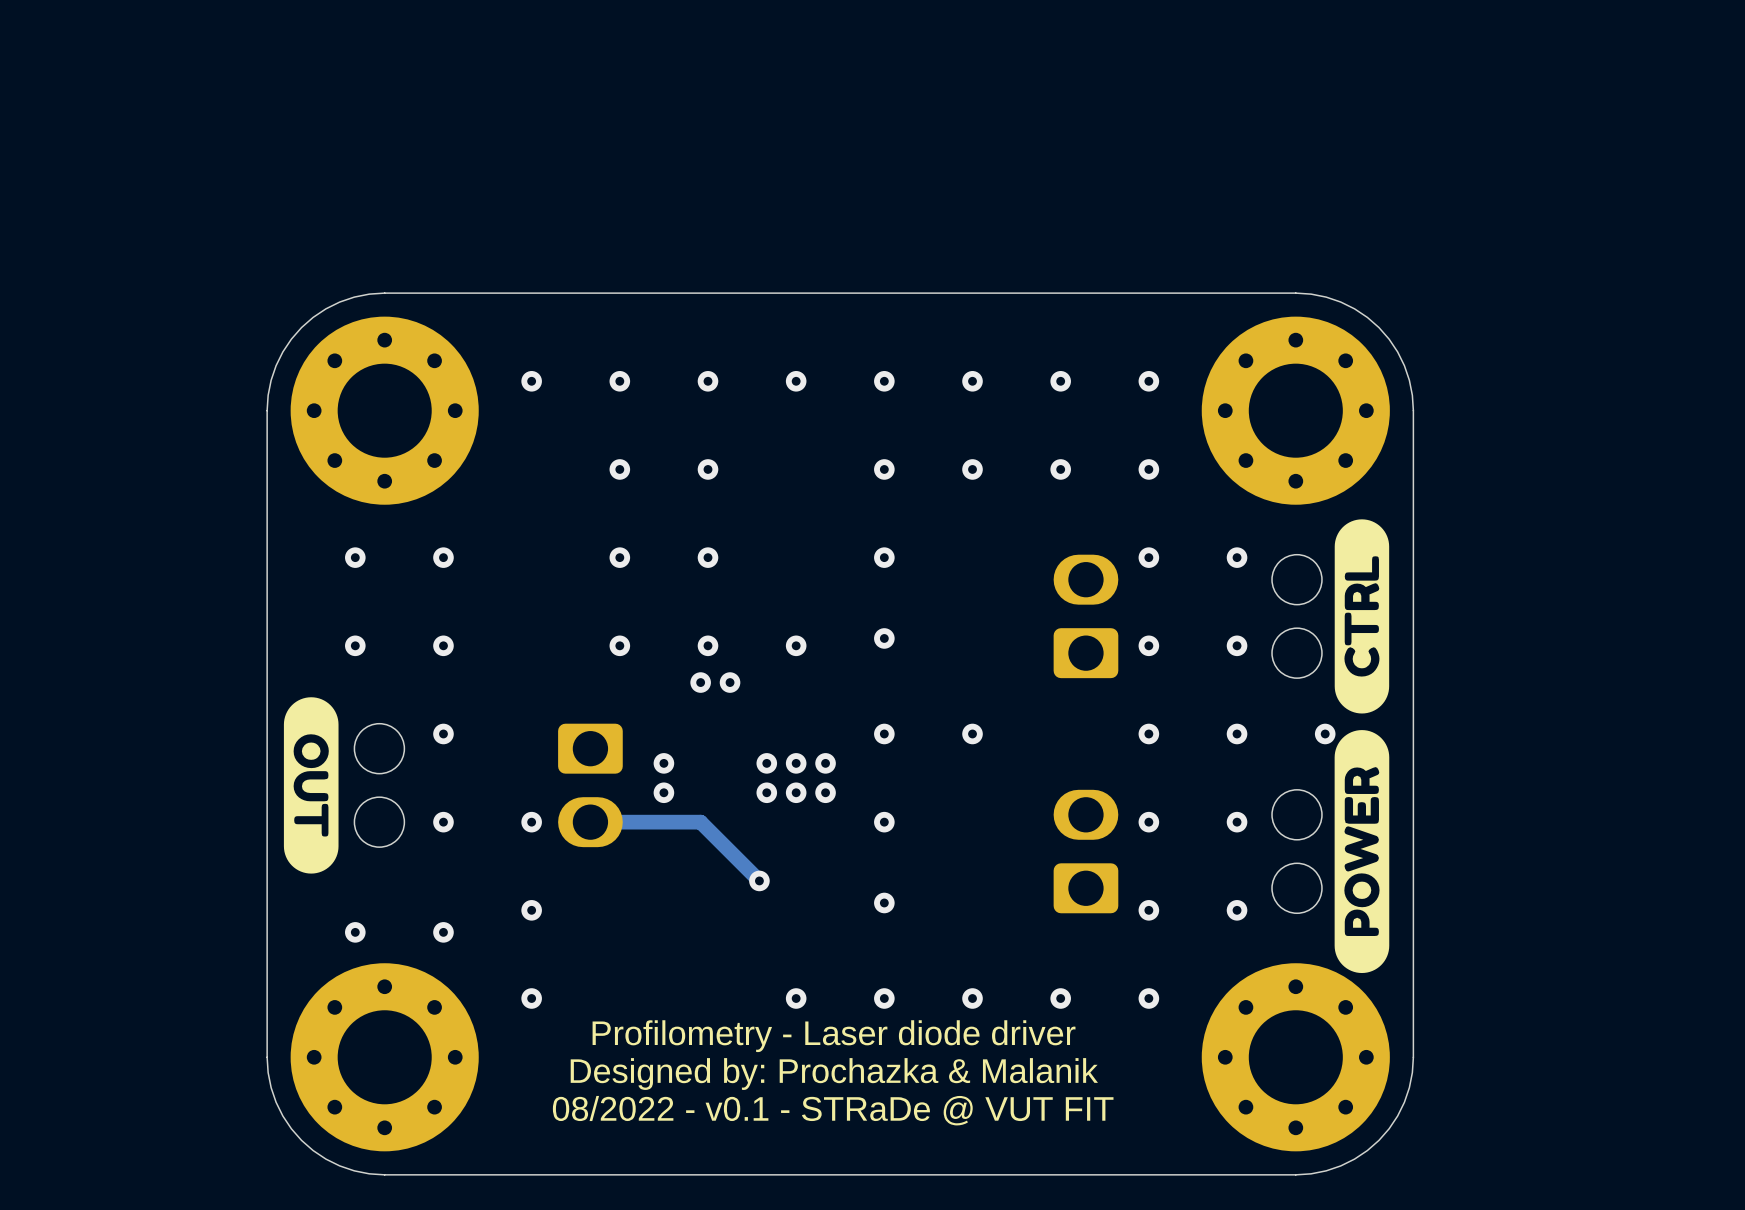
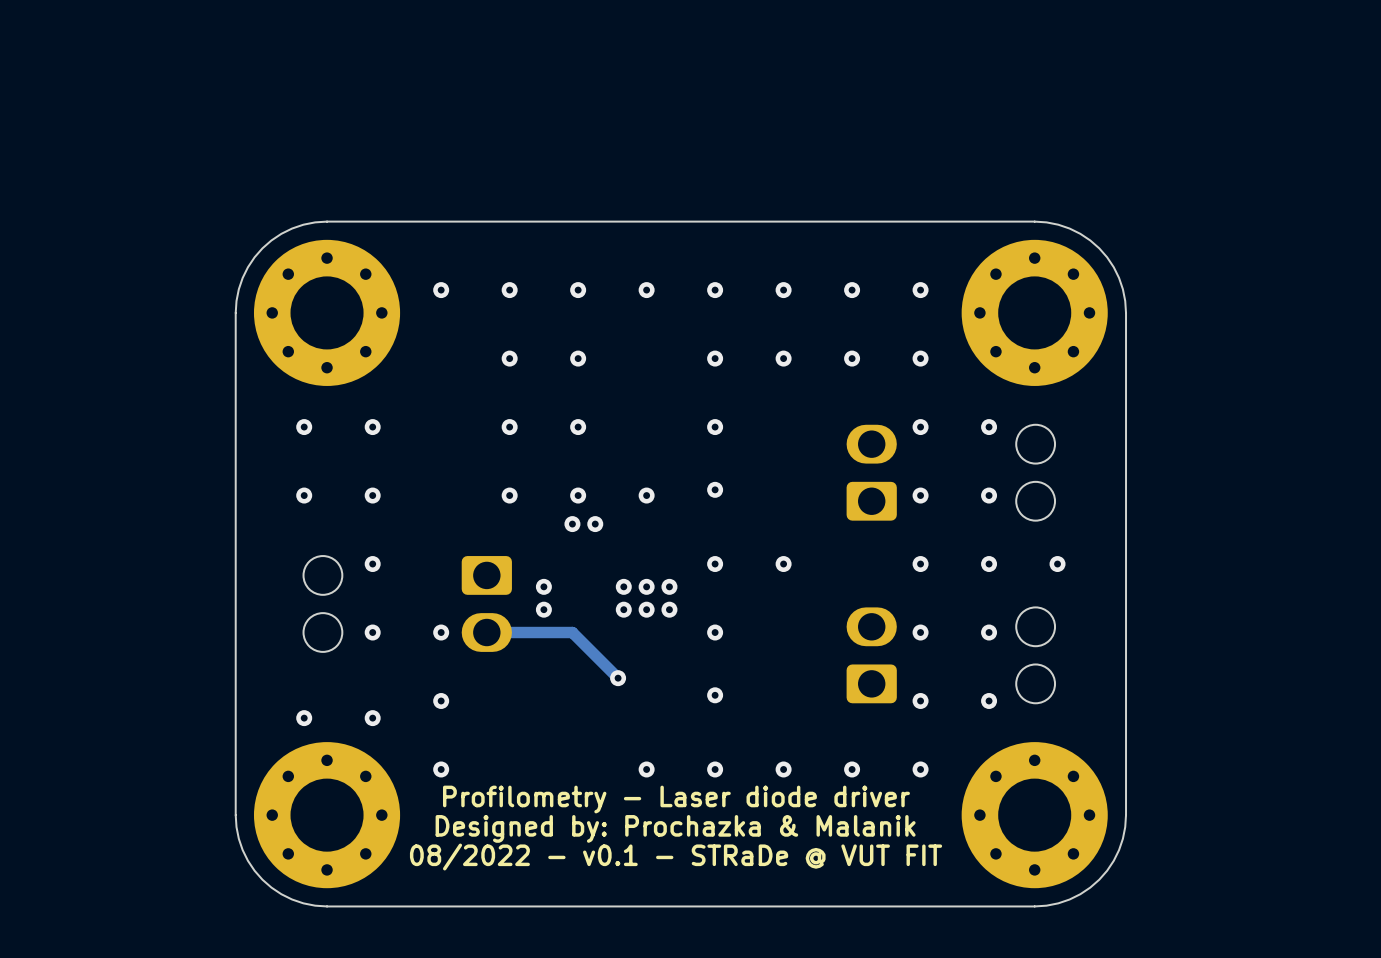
drawing: [1334, 519, 1390, 974] -> none
drawing: [283, 697, 339, 874] -> none

